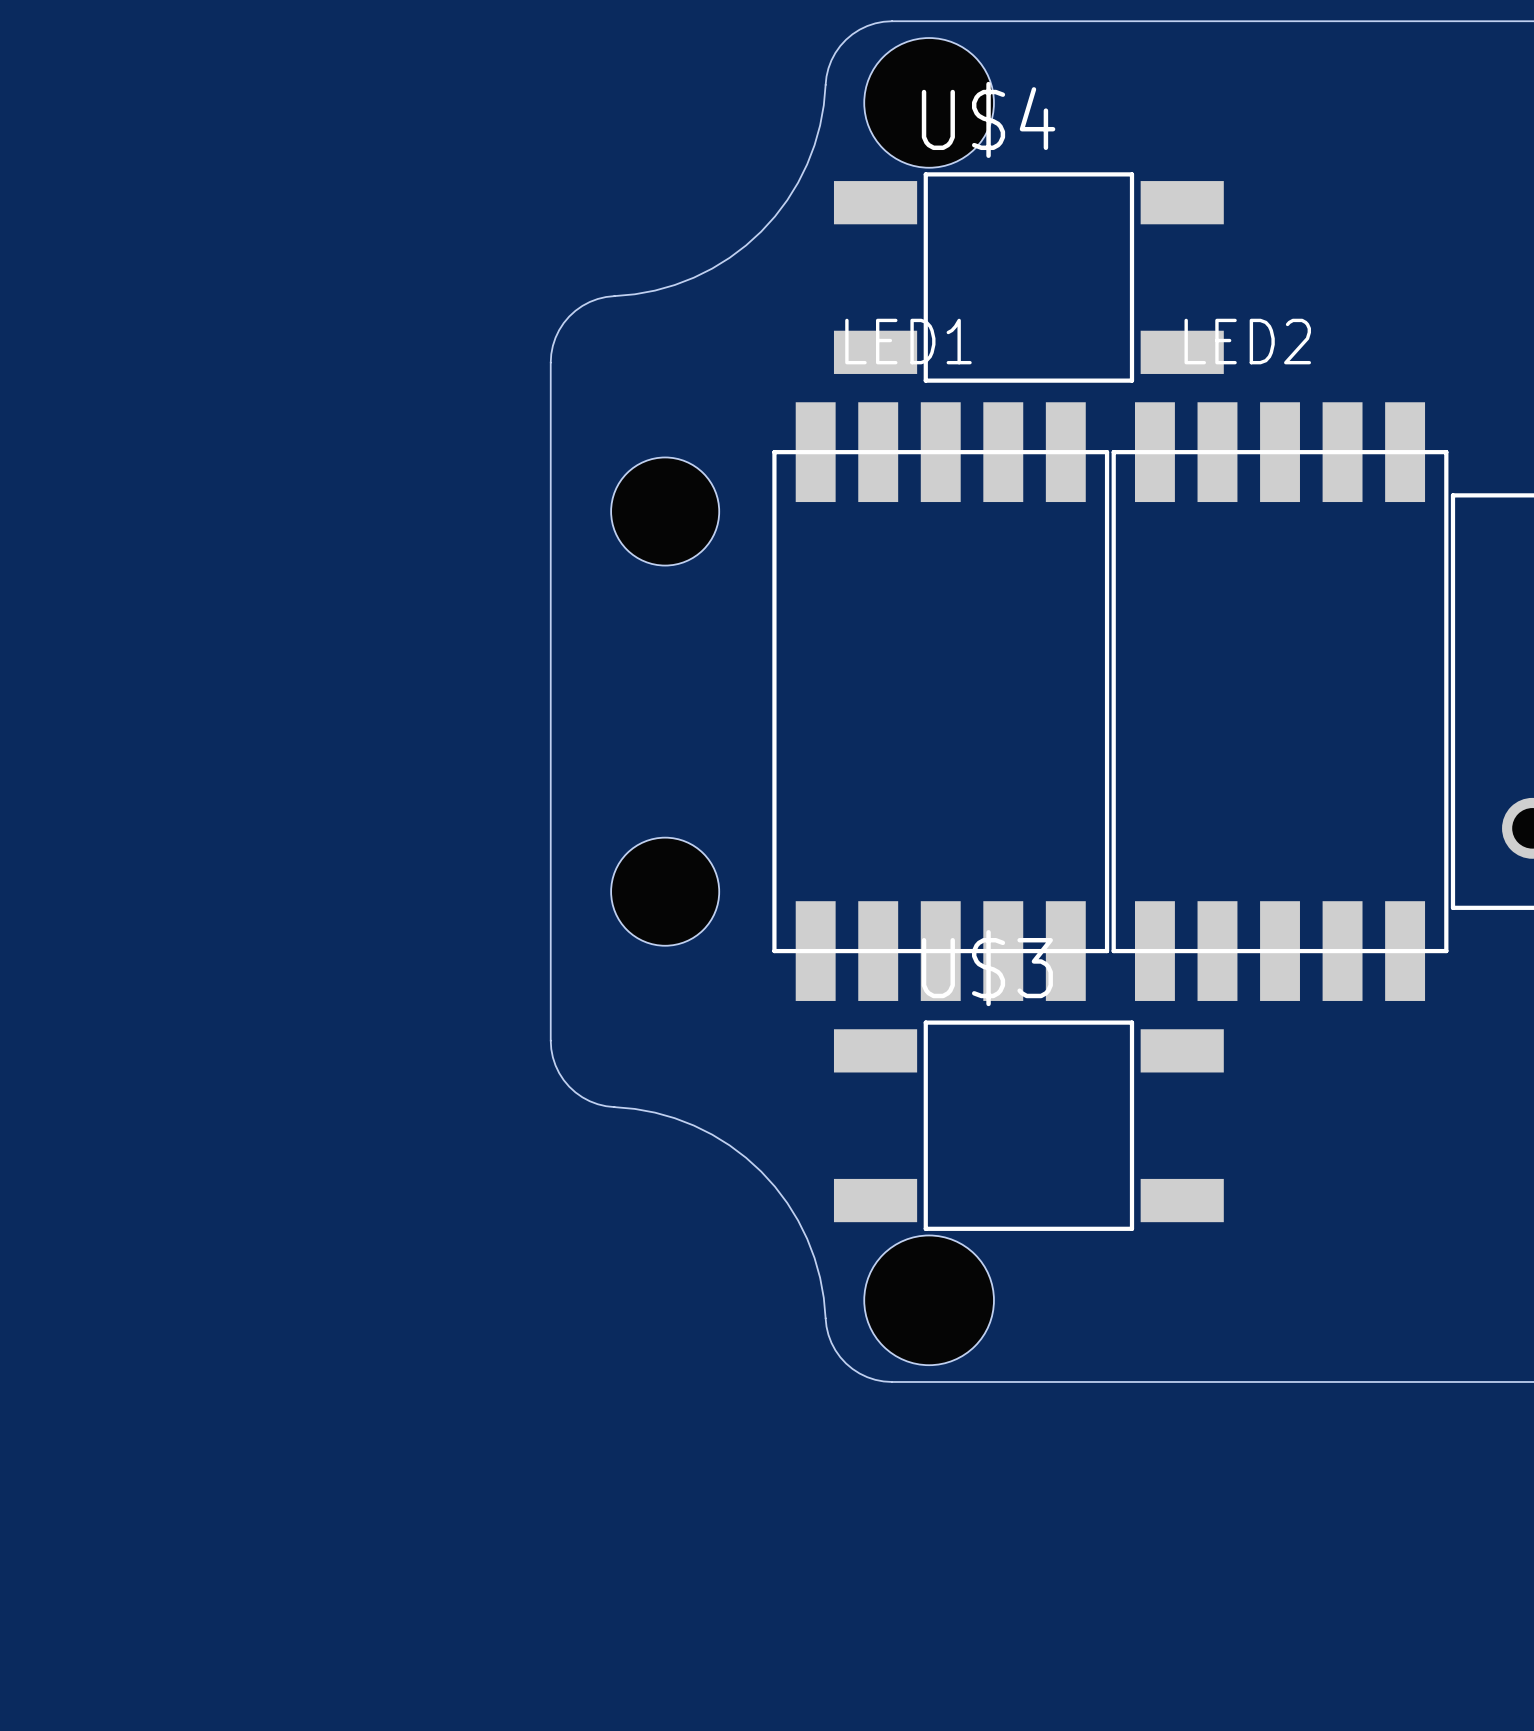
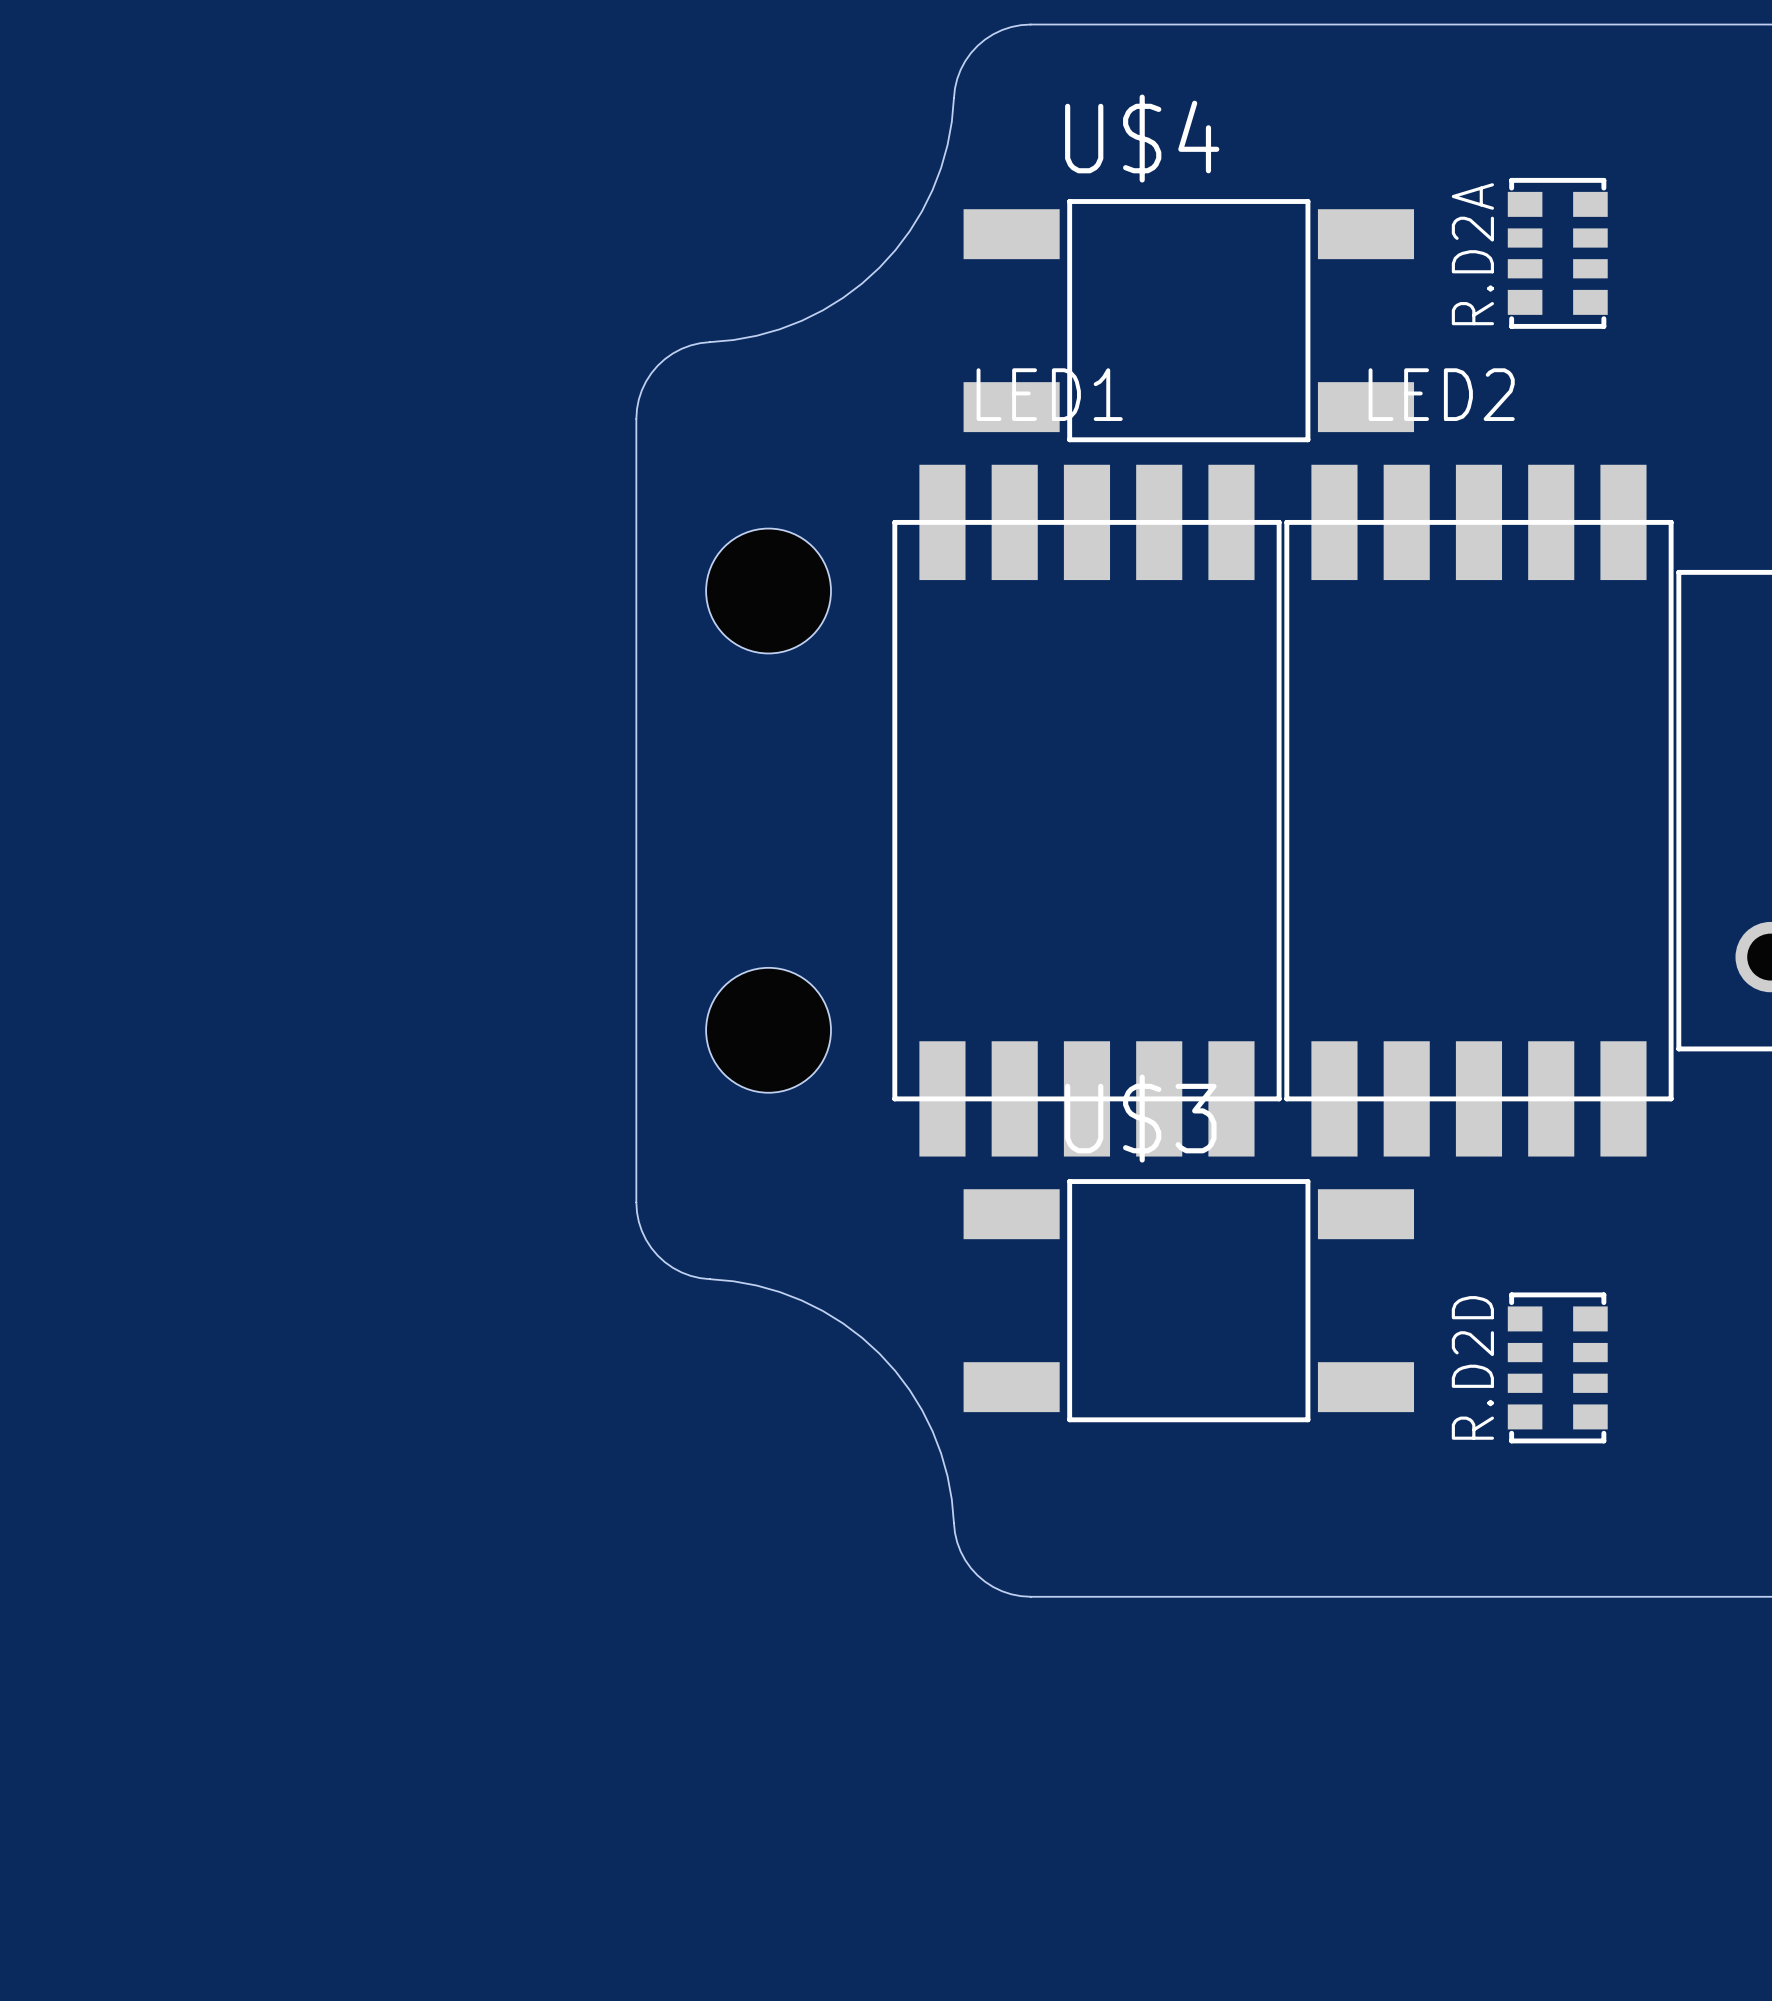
hole: (929, 102) -> none
R.D2A: none -> (1557, 253)
R.D2D: none -> (1557, 1367)
hole: (929, 1300) -> none

